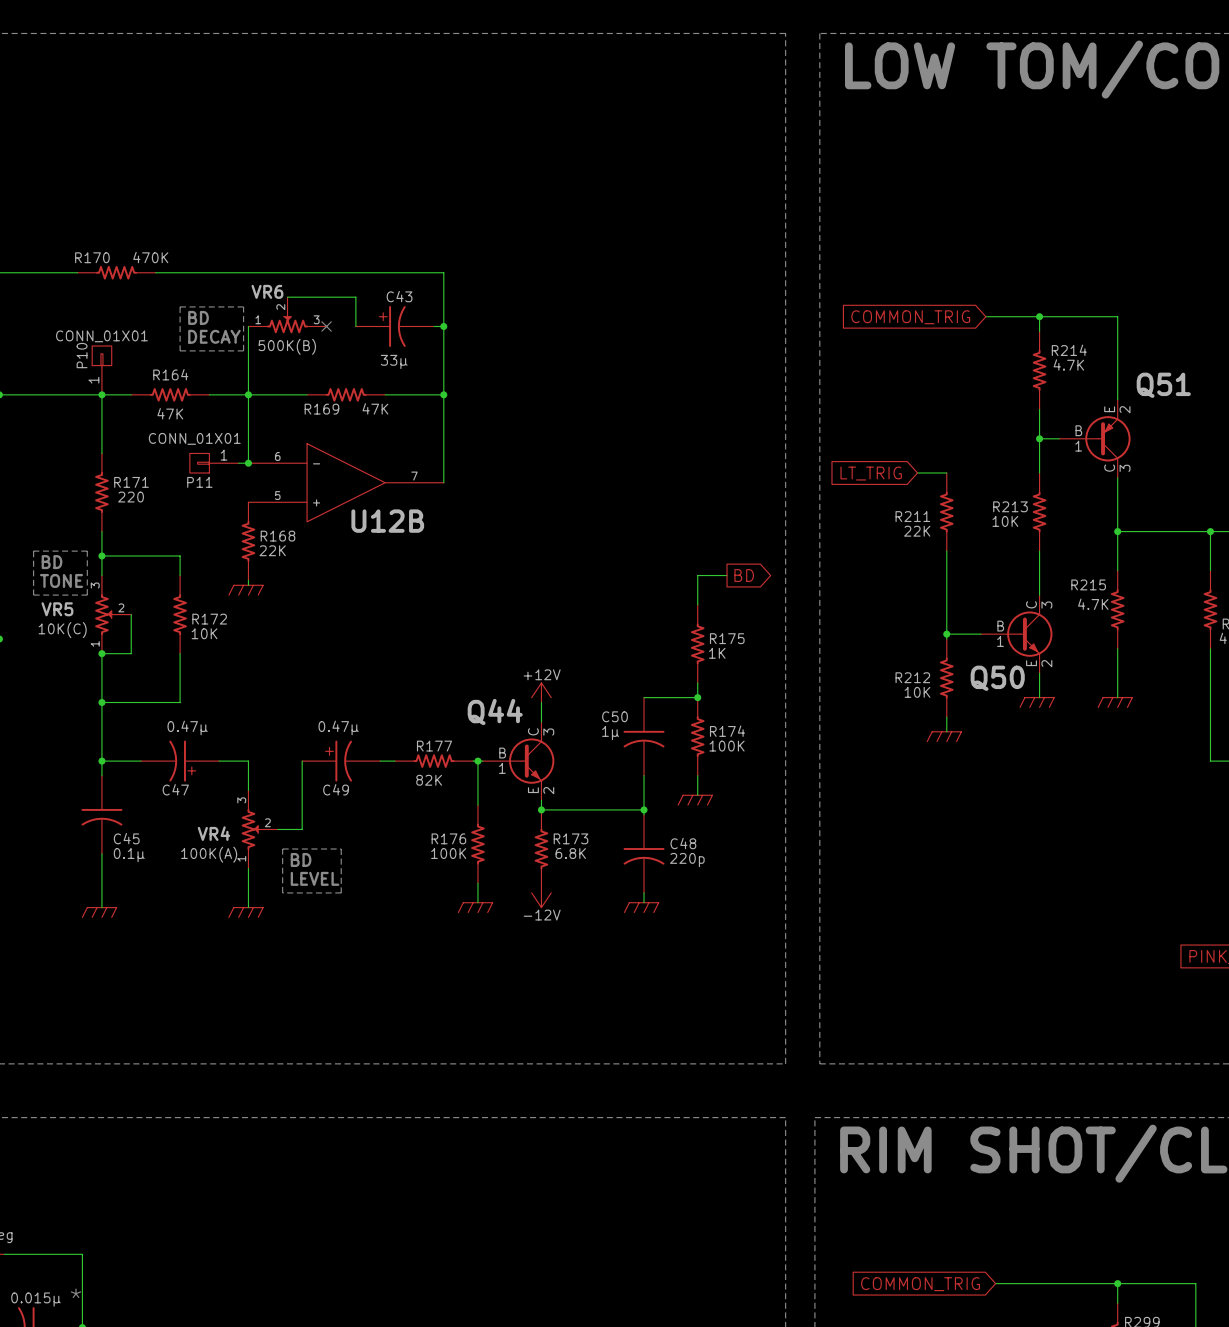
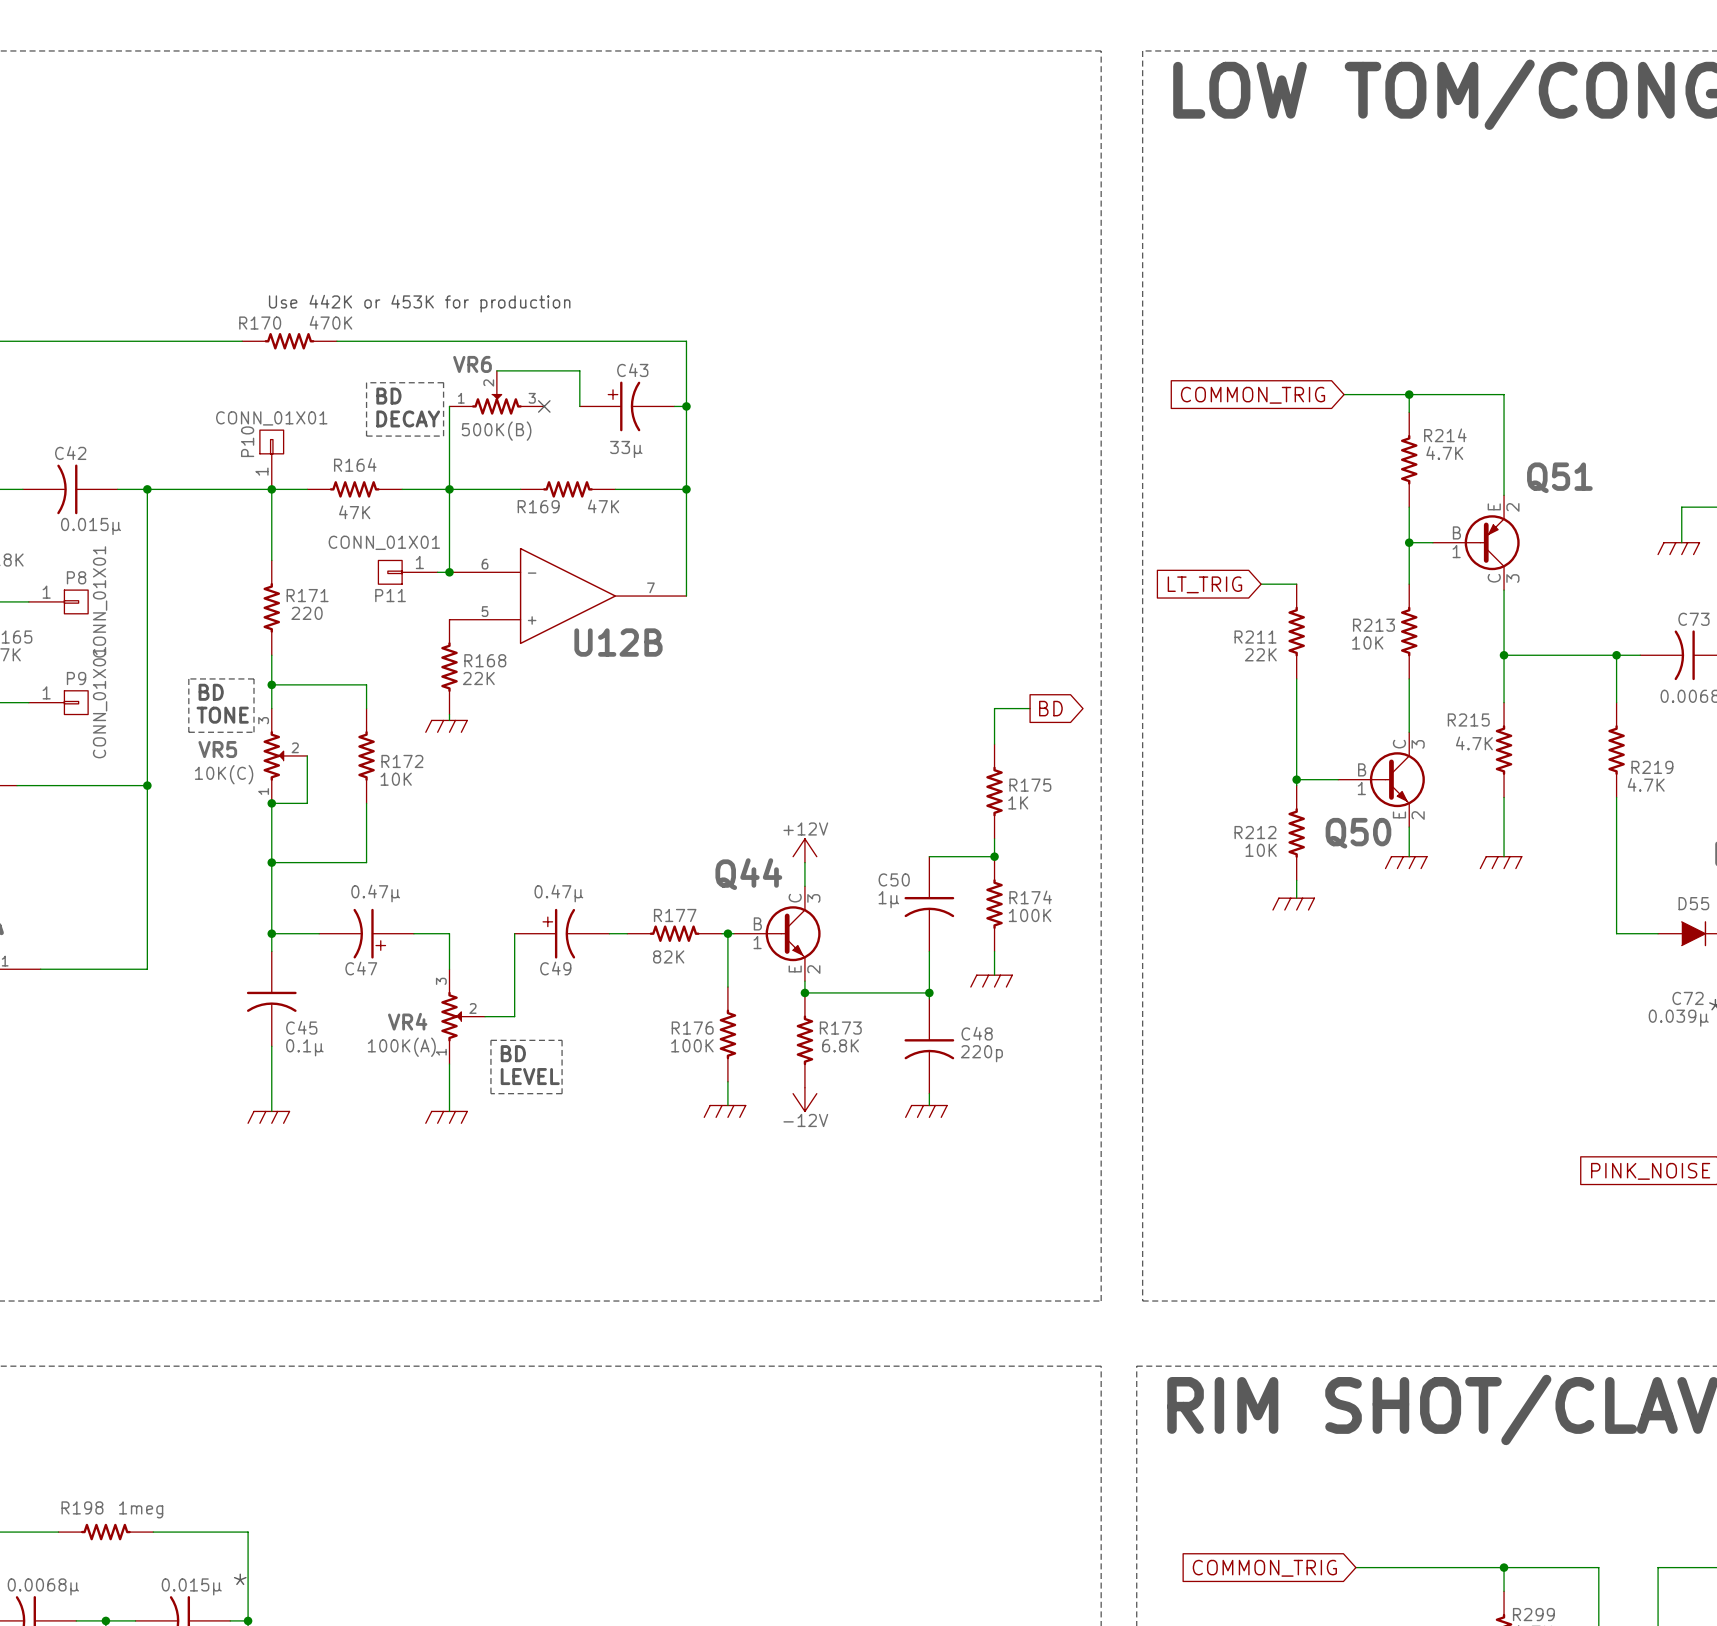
text: none -> Use 442K or 453K for production (419, 303)

